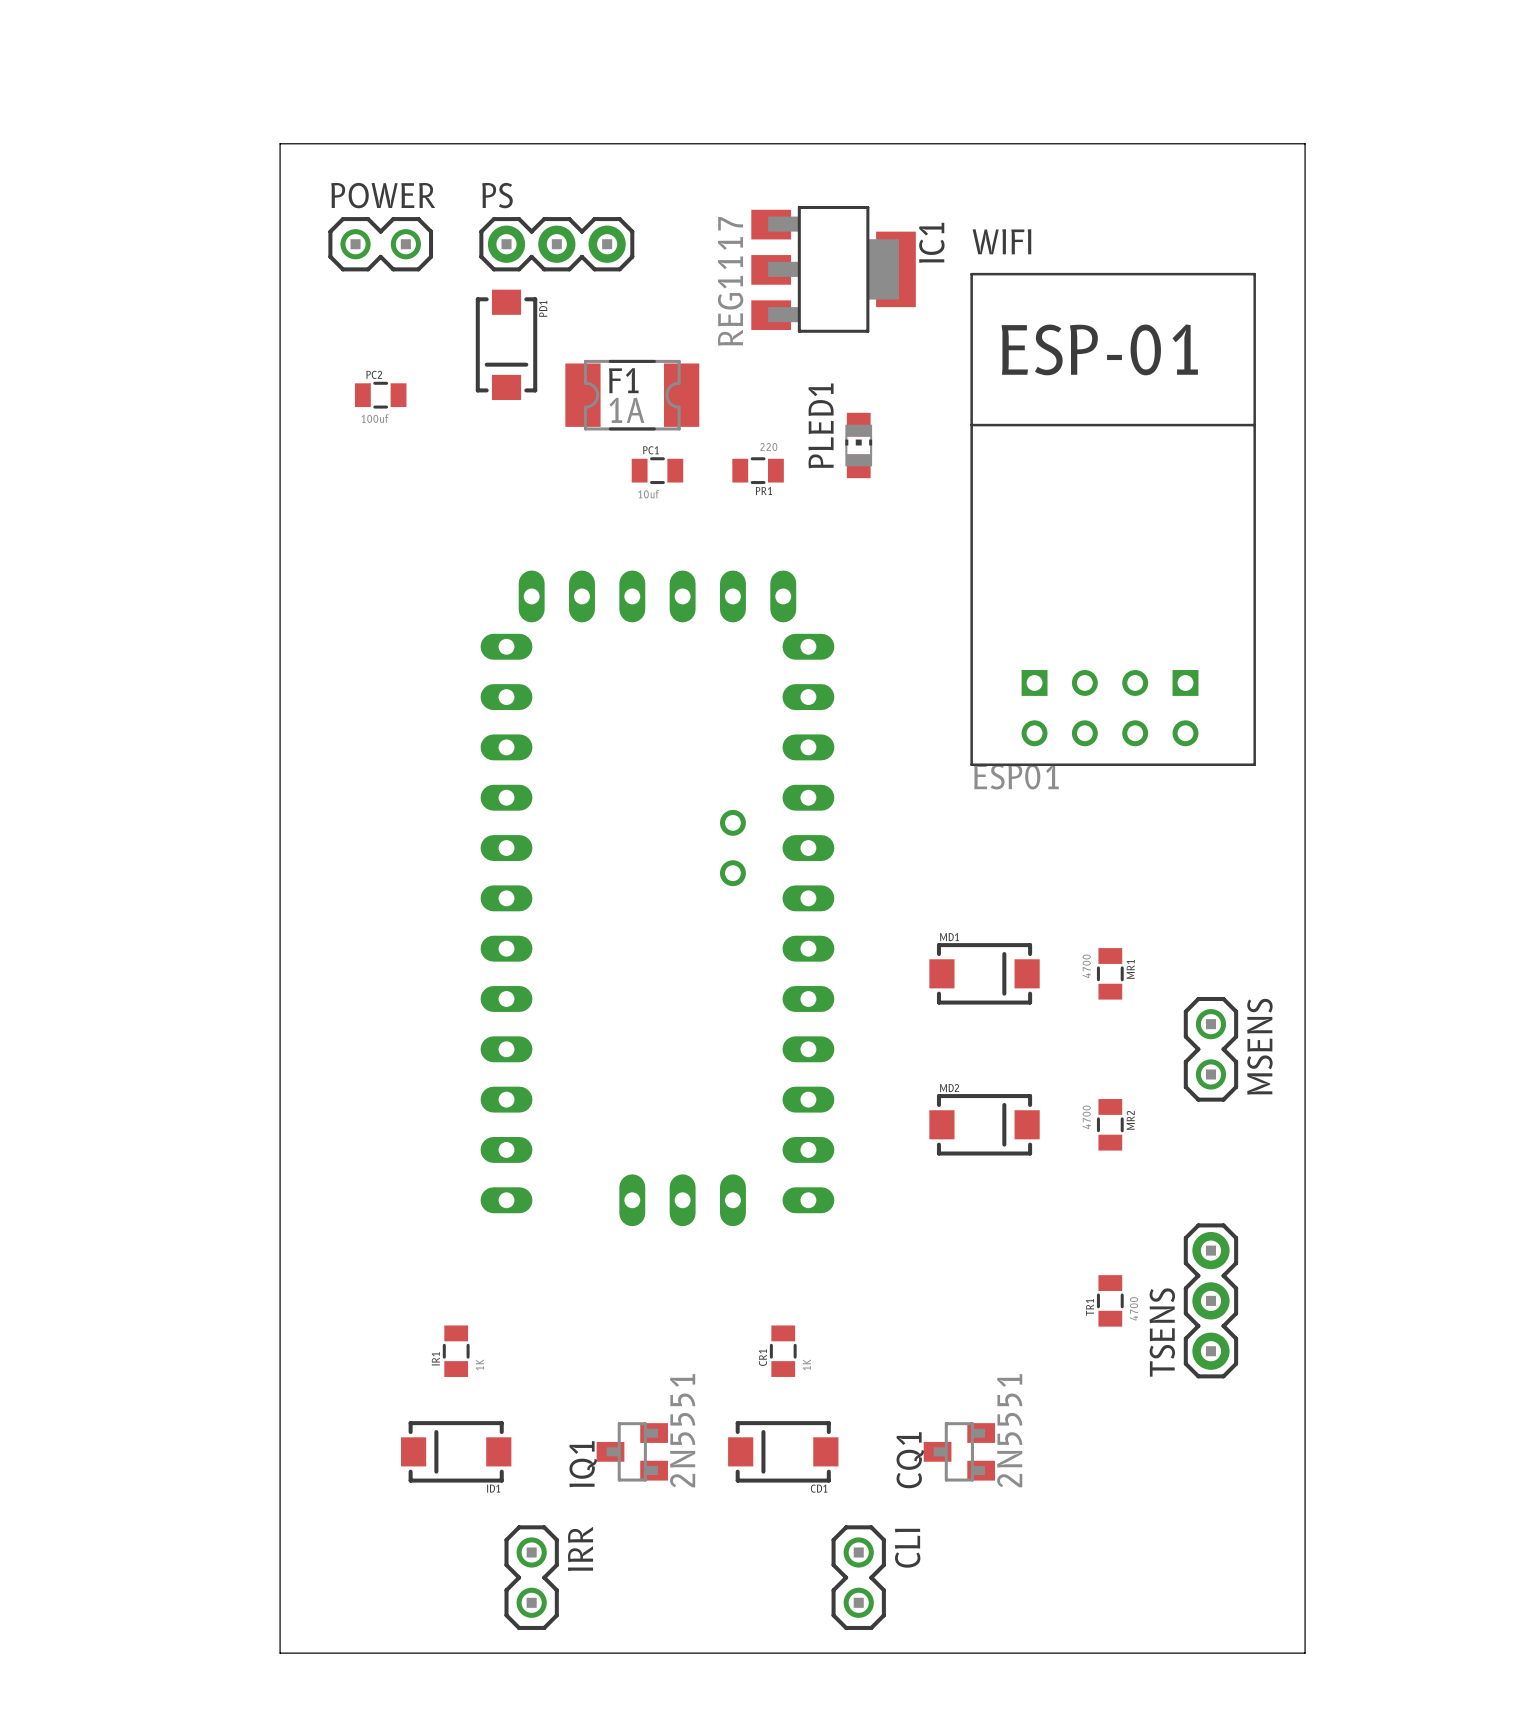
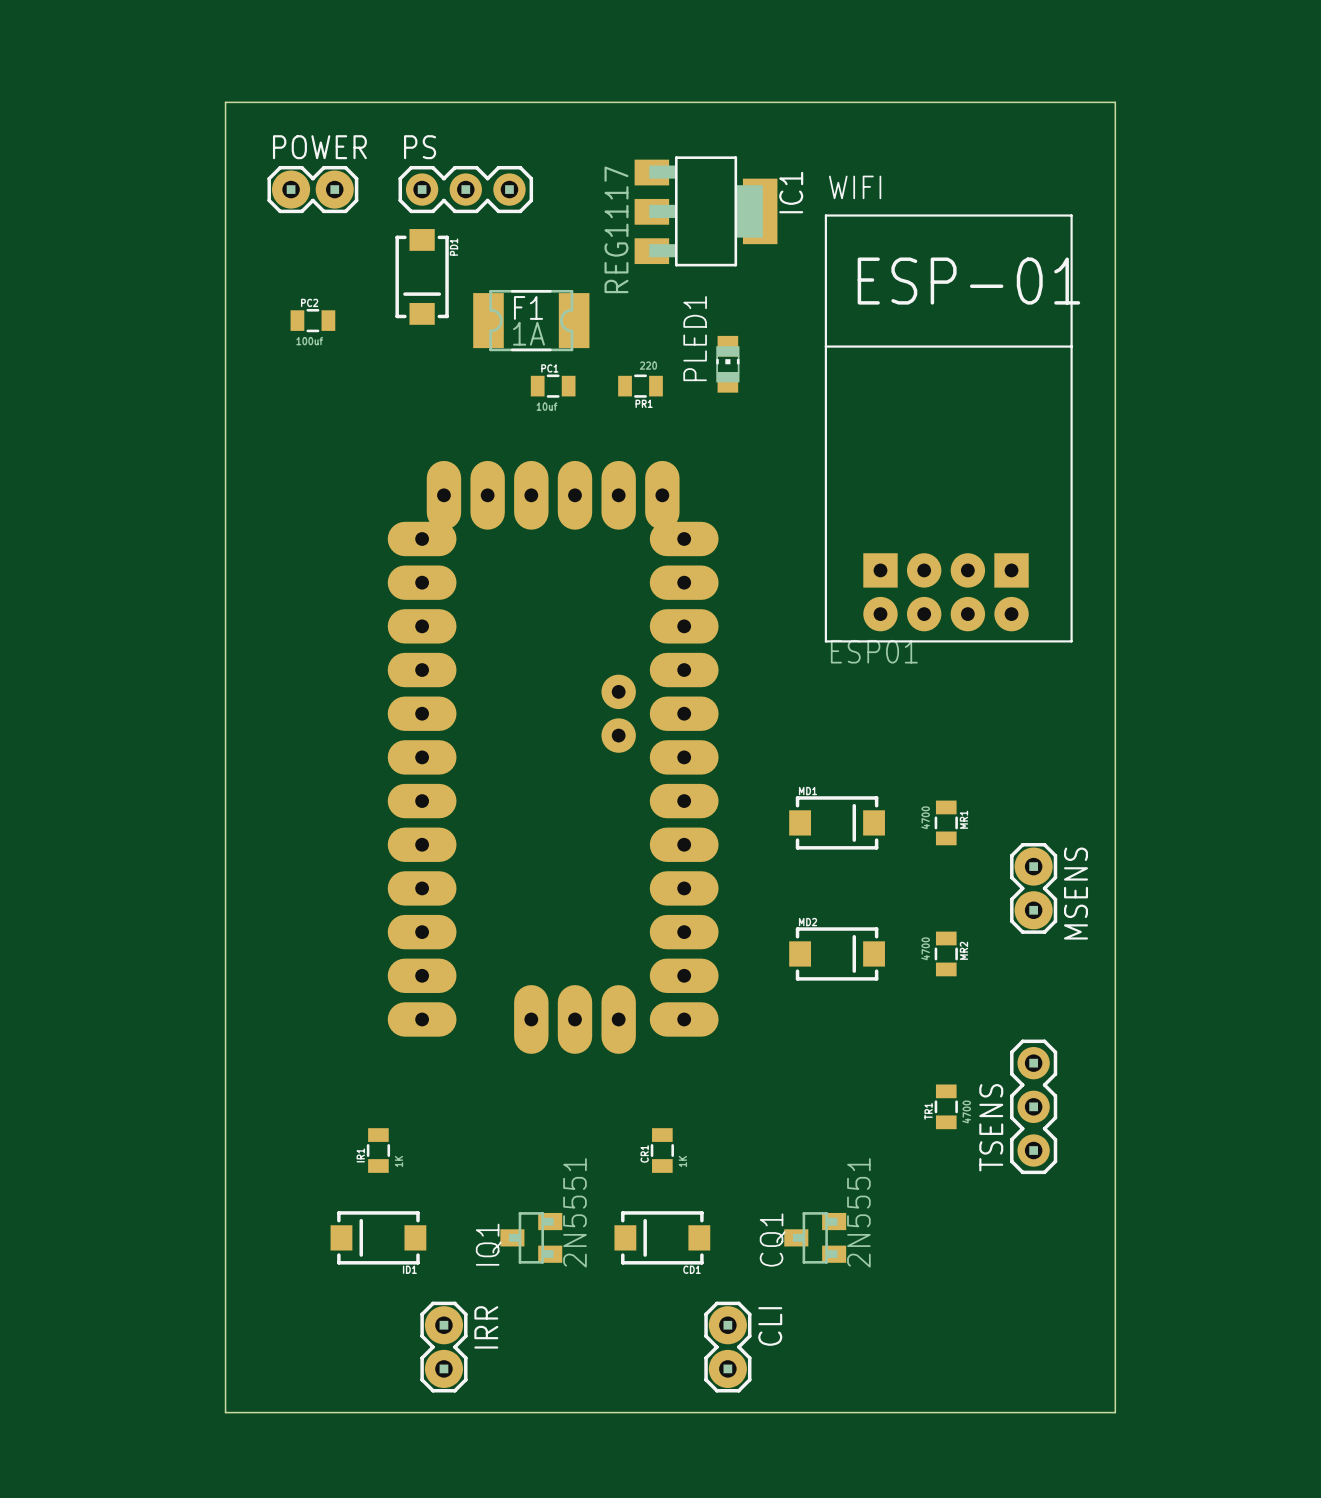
POWER footprint: [328, 217, 434, 272] -> [267, 165, 359, 214]
WIFI footprint: [970, 272, 1256, 766] -> [824, 214, 1073, 643]
part footprint: [480, 570, 835, 1227] -> [387, 460, 719, 1054]
MSENS footprint: [1183, 996, 1239, 1102] -> [1010, 843, 1058, 934]
IRR footprint: [504, 1525, 559, 1630] -> [420, 1301, 468, 1393]
CLI footprint: [831, 1525, 886, 1630] -> [704, 1301, 752, 1393]

